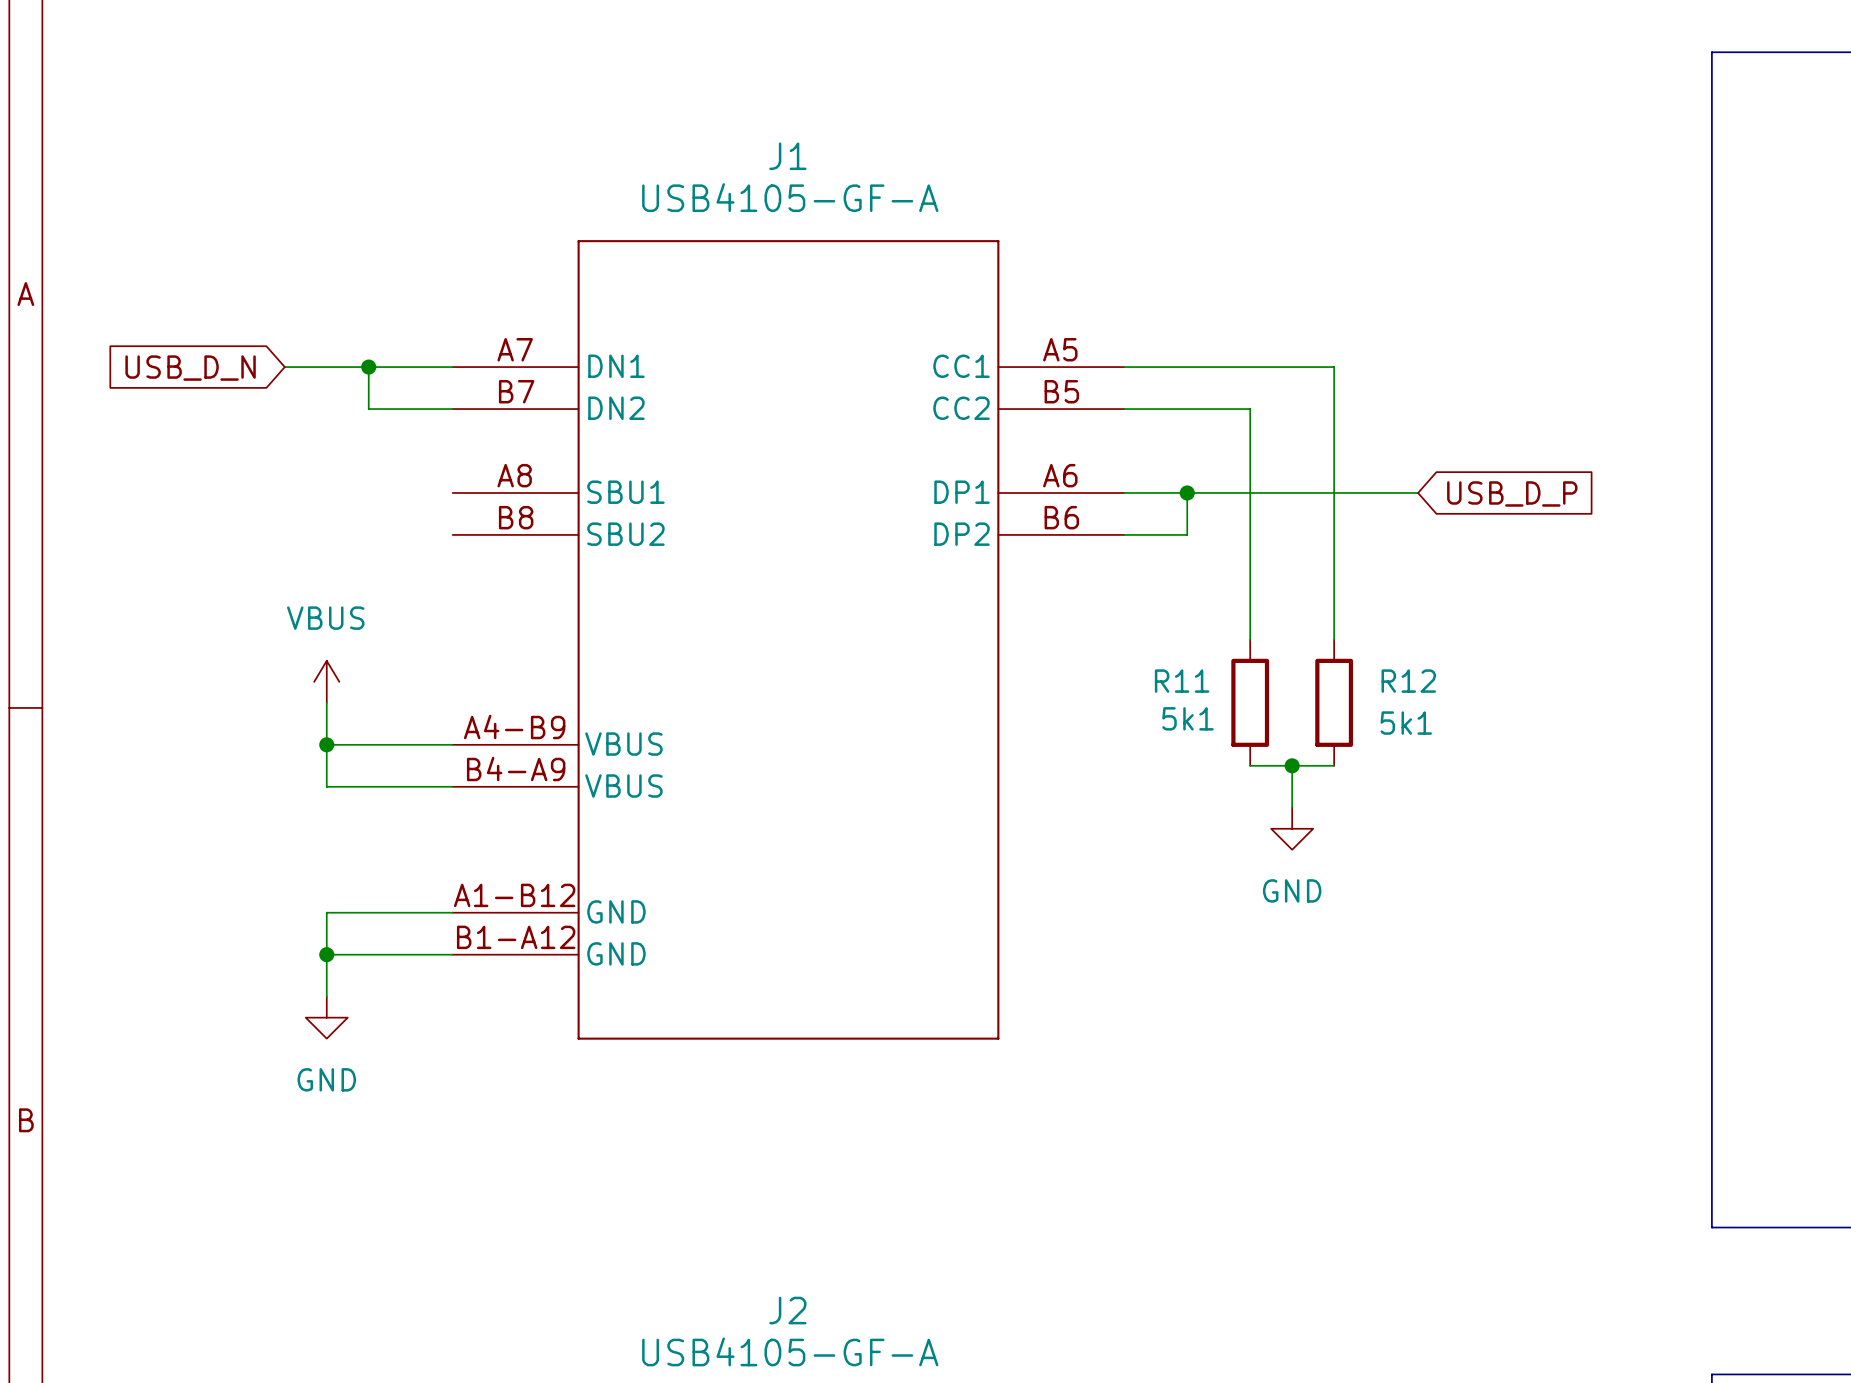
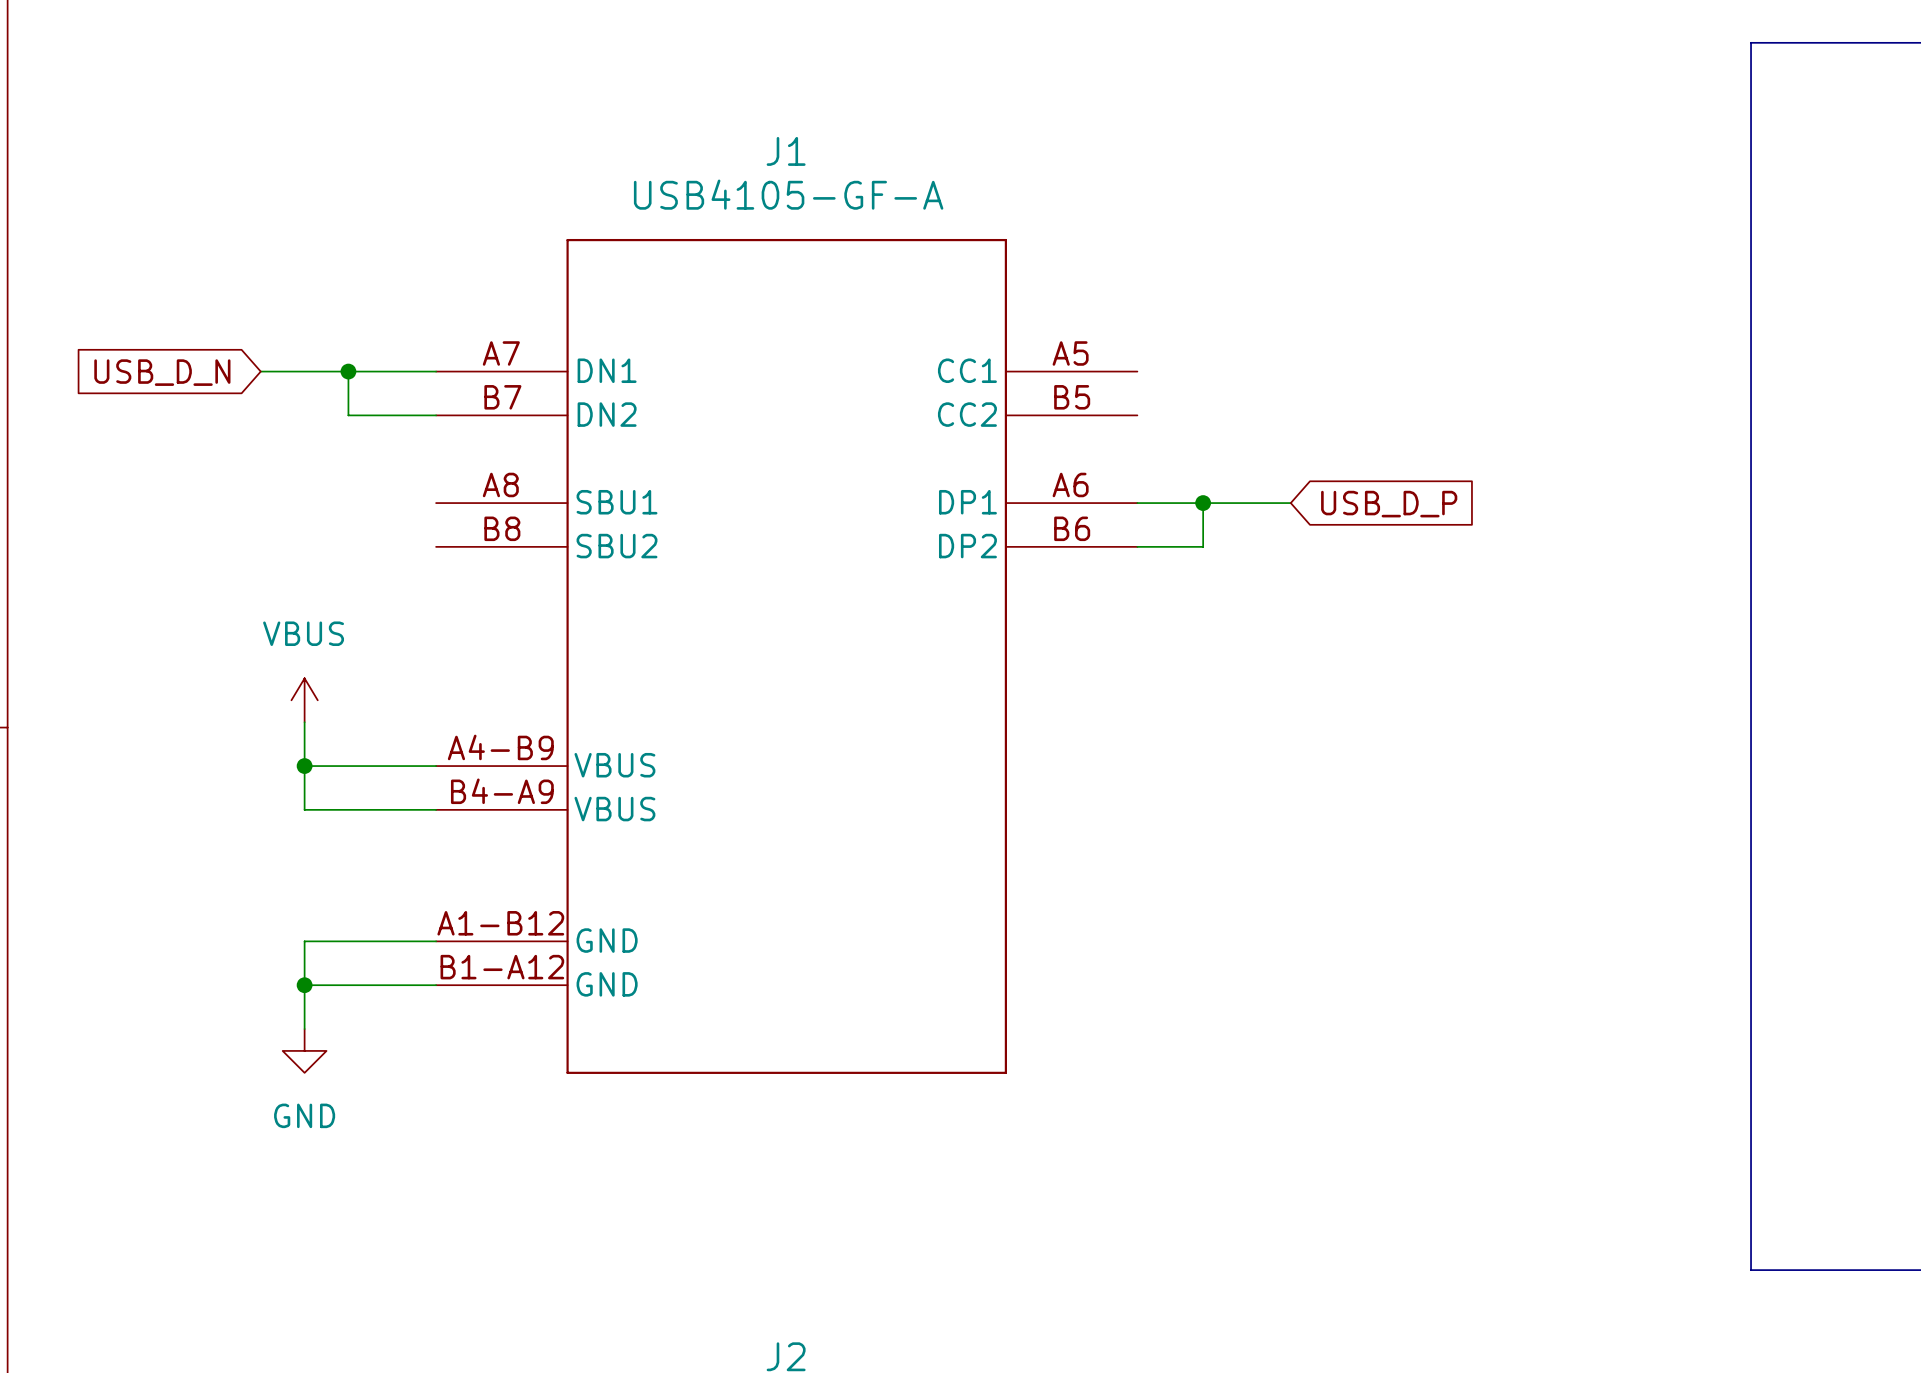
wire: (1124, 367) (1334, 367) (1334, 639) -> none
wire: (1124, 409) (1250, 409) (1250, 639) -> none
wire: (1271, 492) (1418, 492) -> none
global label position: USB_D_P (1512, 493) -> USB_D_P (1389, 504)
R11: 5k1 (1250, 702) -> none
R12: 5k1 (1334, 702) -> none
wire: (1250, 765) (1334, 765) -> none
wire: (1292, 765) (1292, 807) -> none
junction: (1292, 765) -> none
power symbol: GND (1292, 828) -> none

